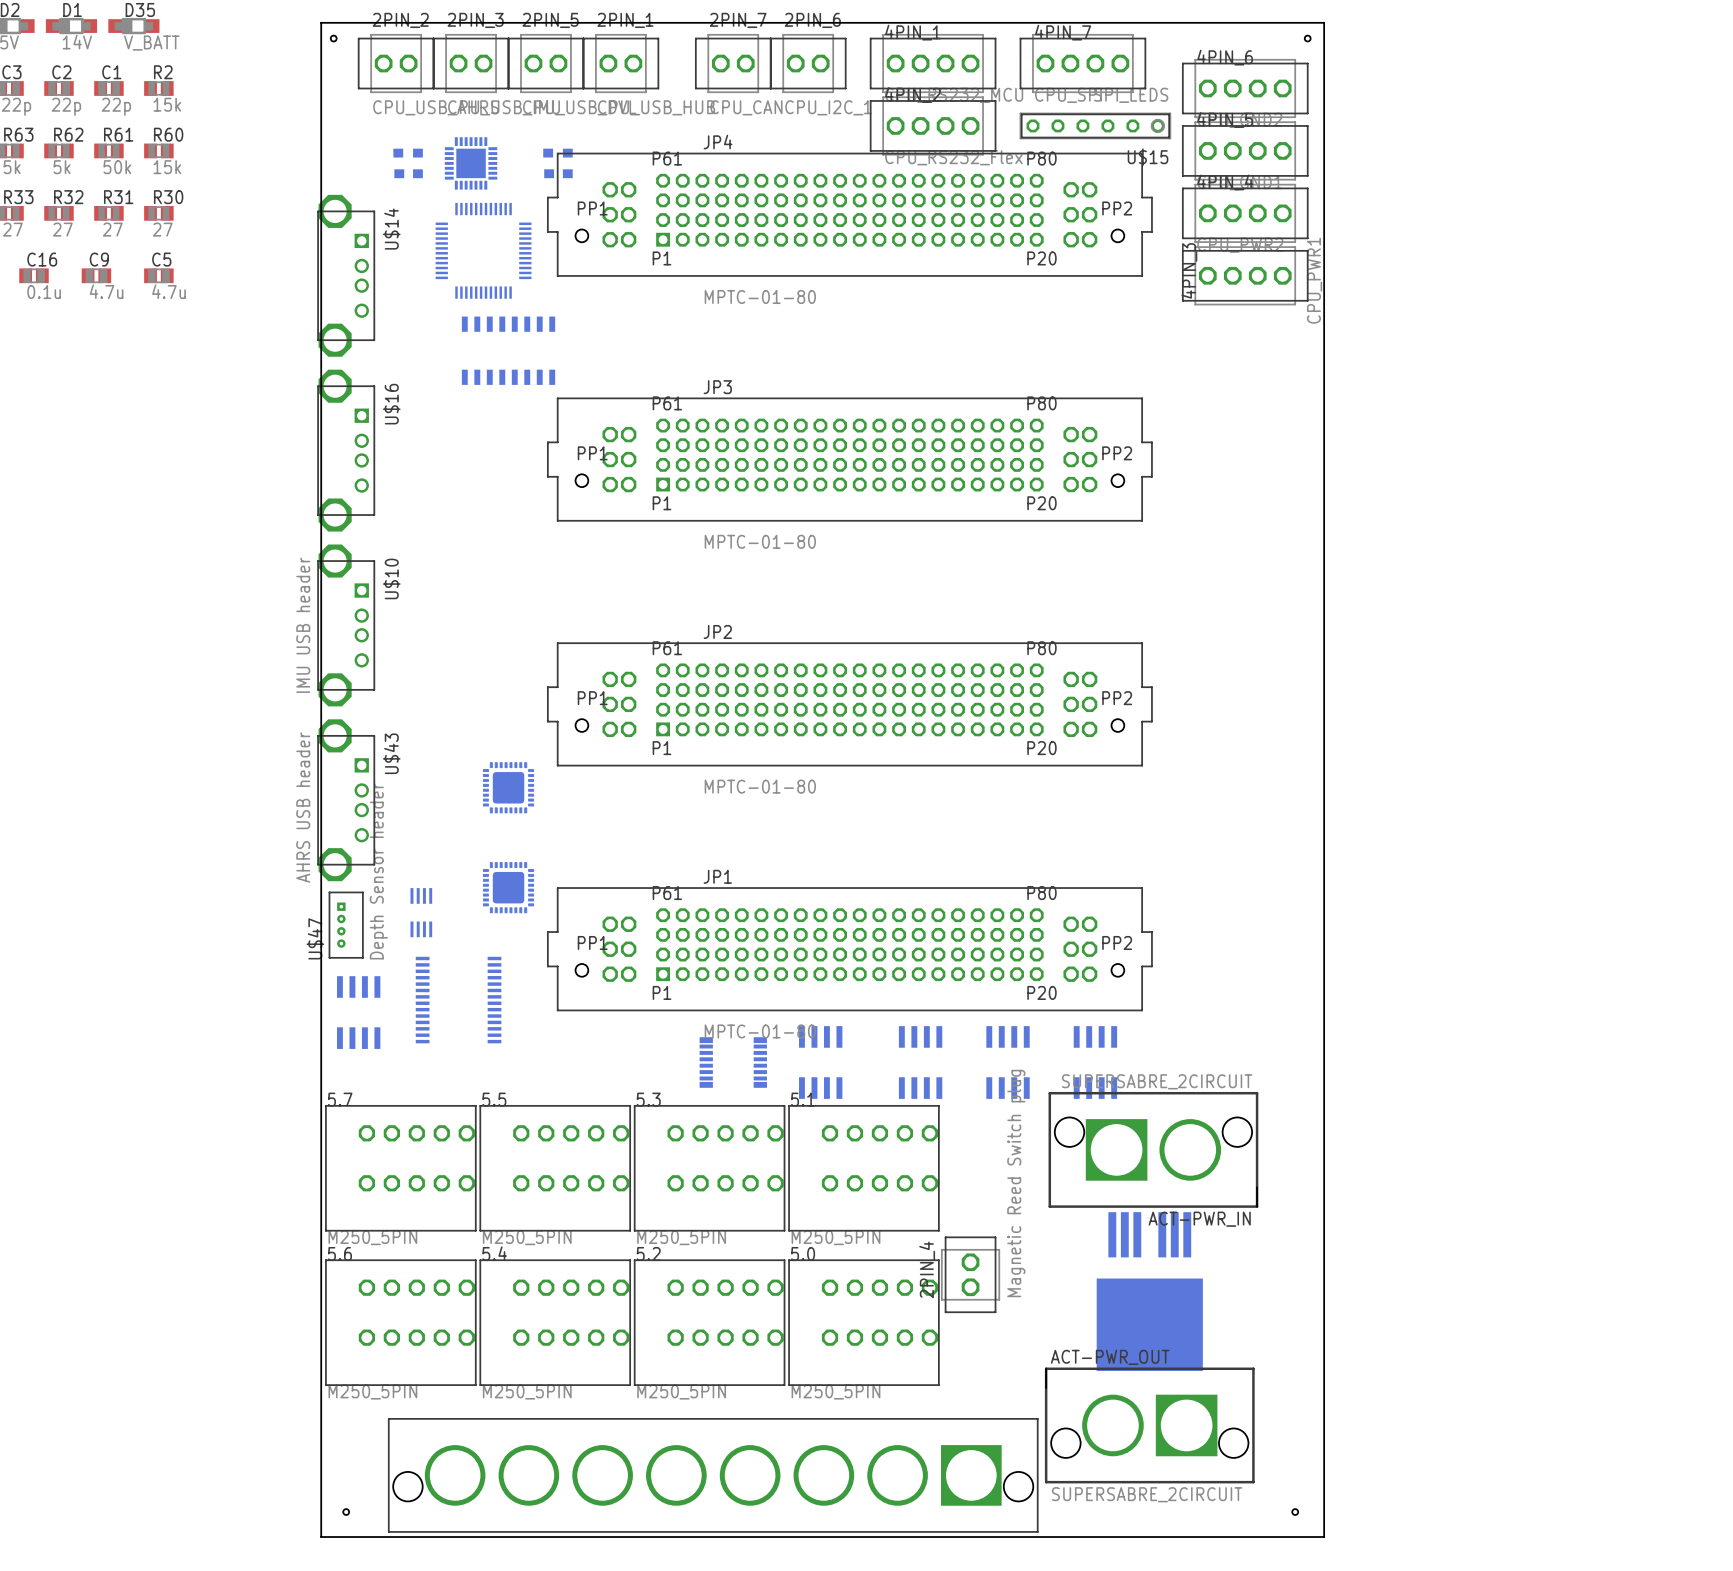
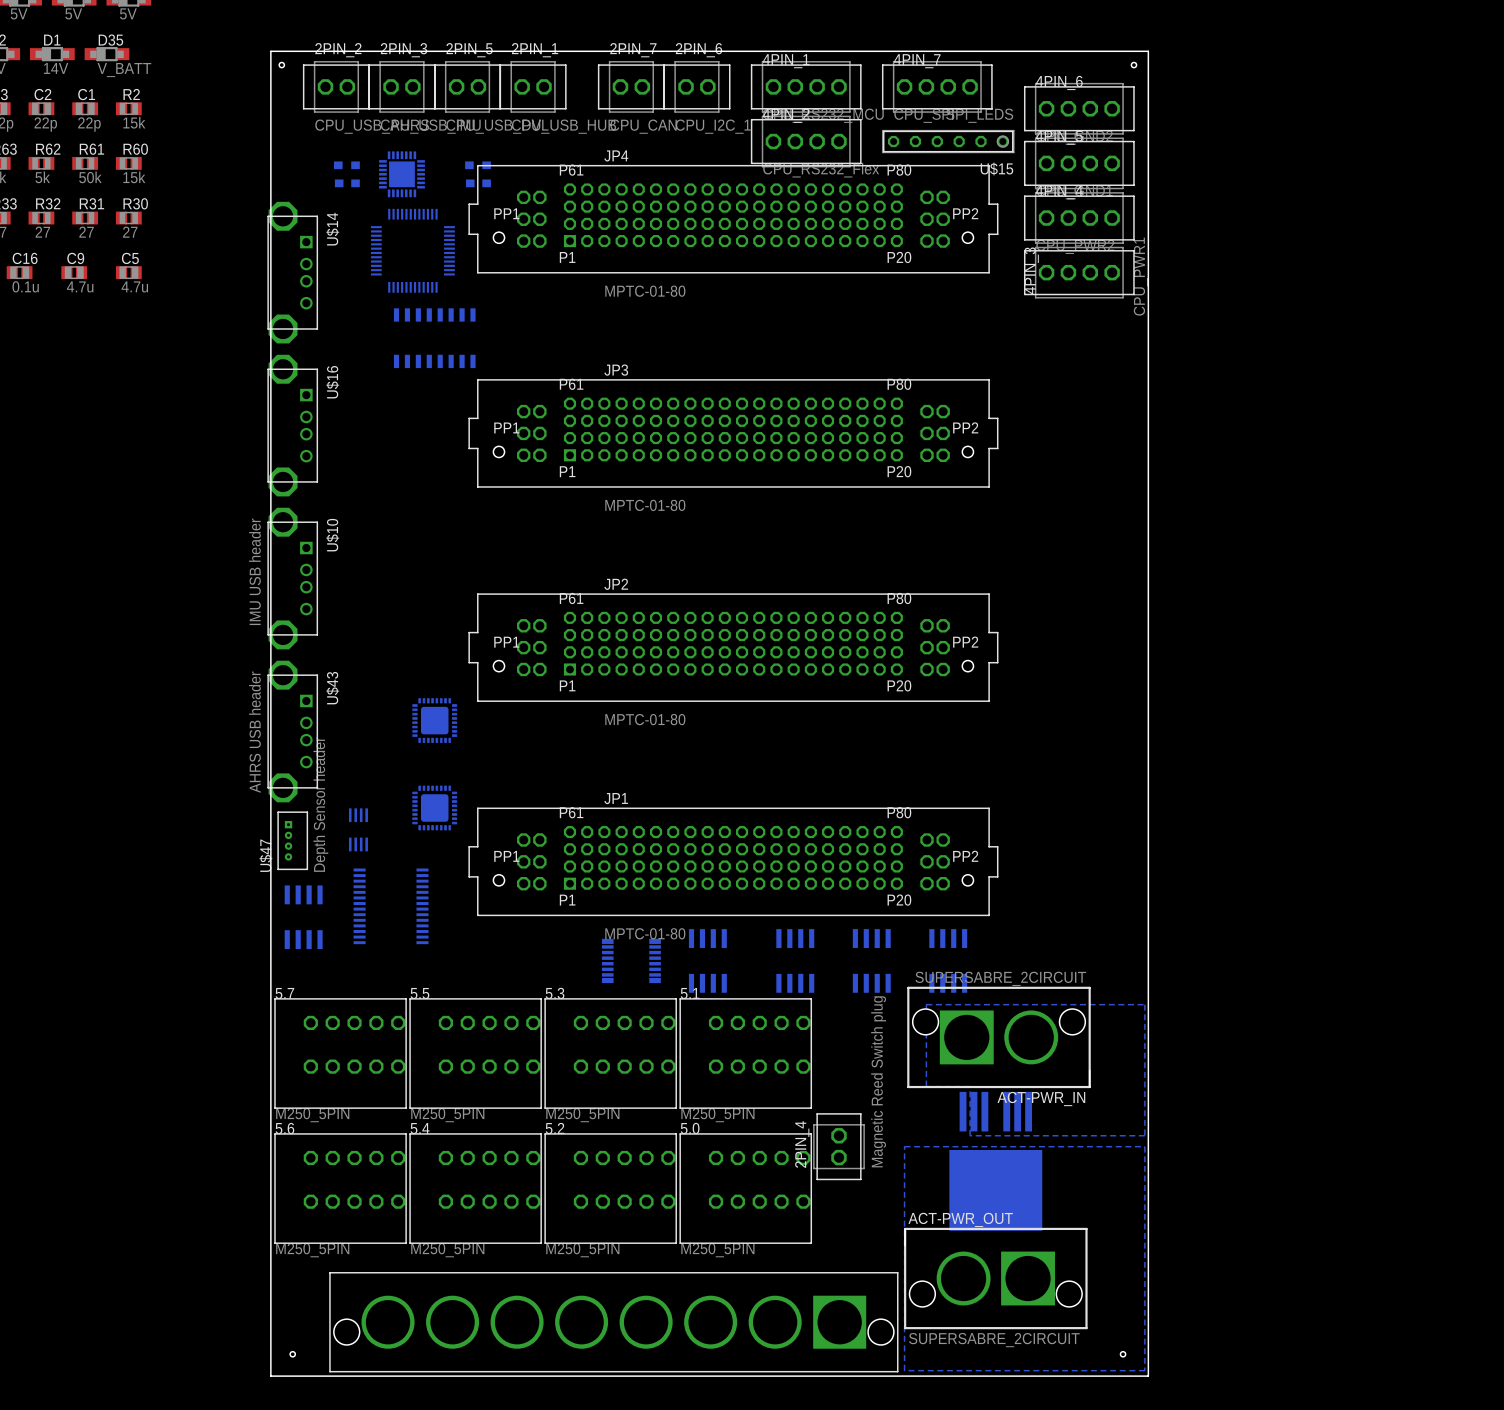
bottom zone outline: none -> (926, 1004) (1144, 1004) (1144, 1135) (970, 1135) (970, 1086) (926, 1086) (926, 1004)
bottom zone outline: none -> (904, 1146) (1144, 1146) (1144, 1370) (904, 1370) (904, 1146)

